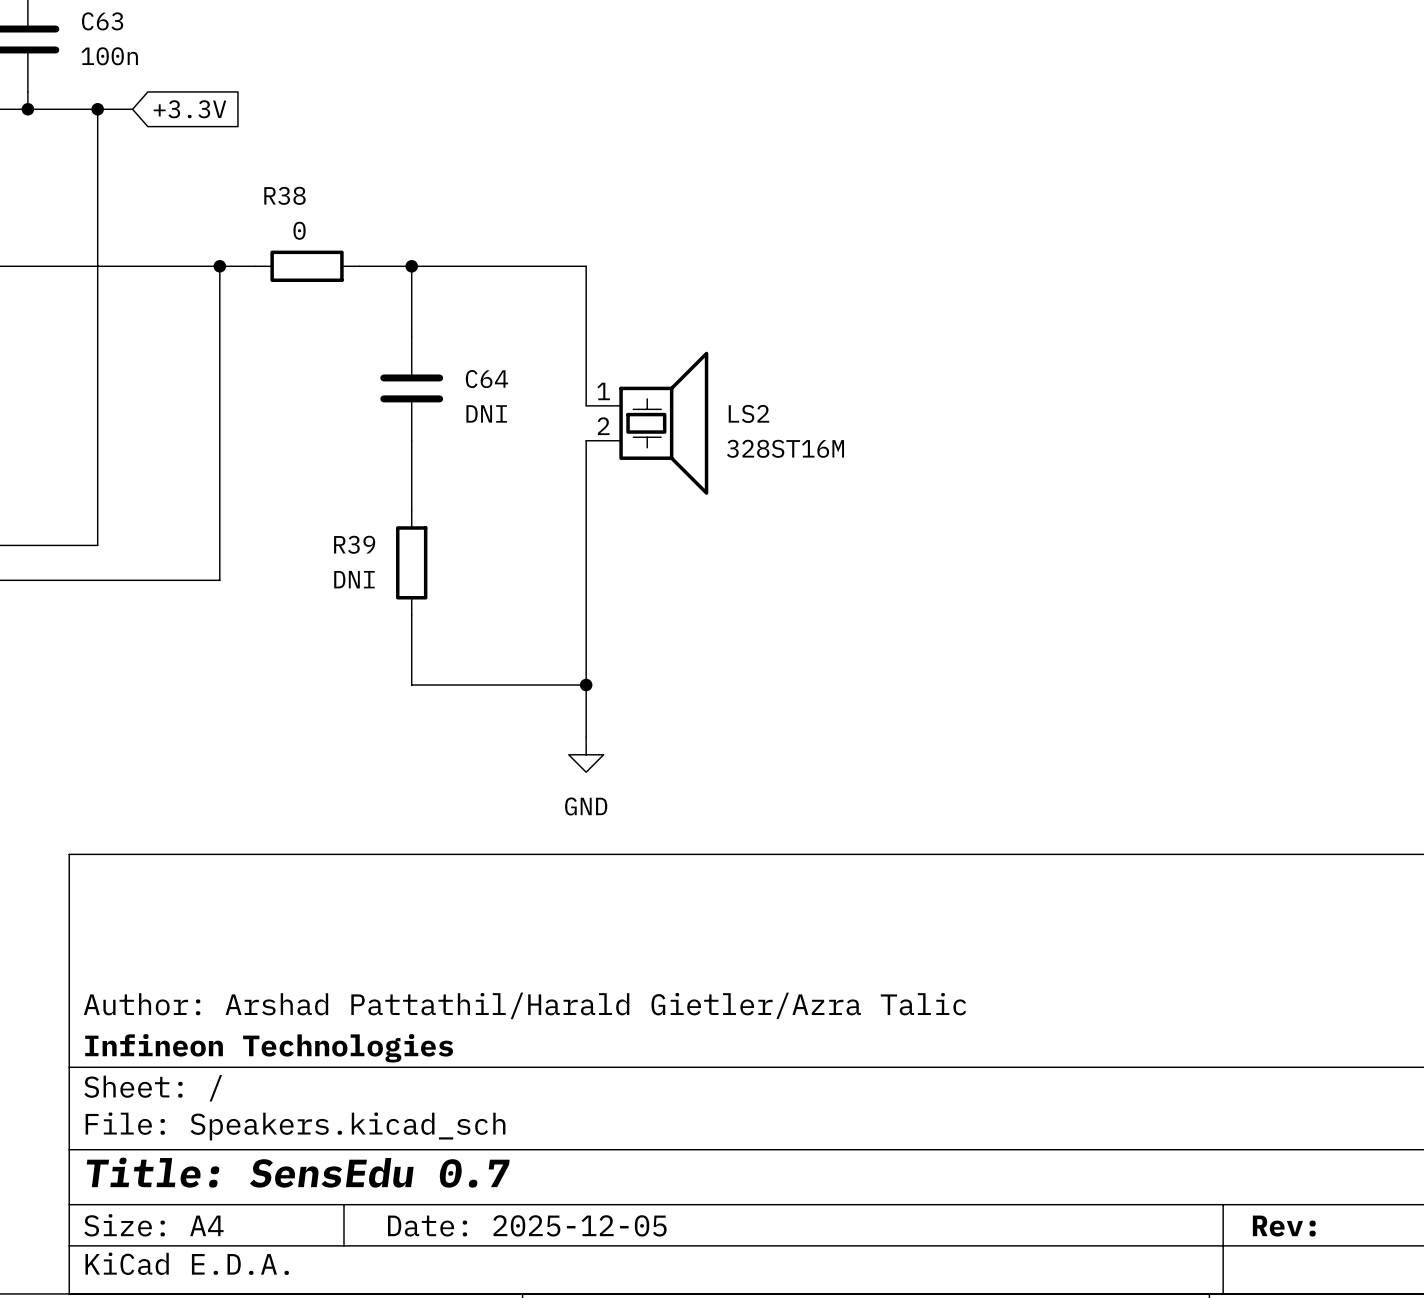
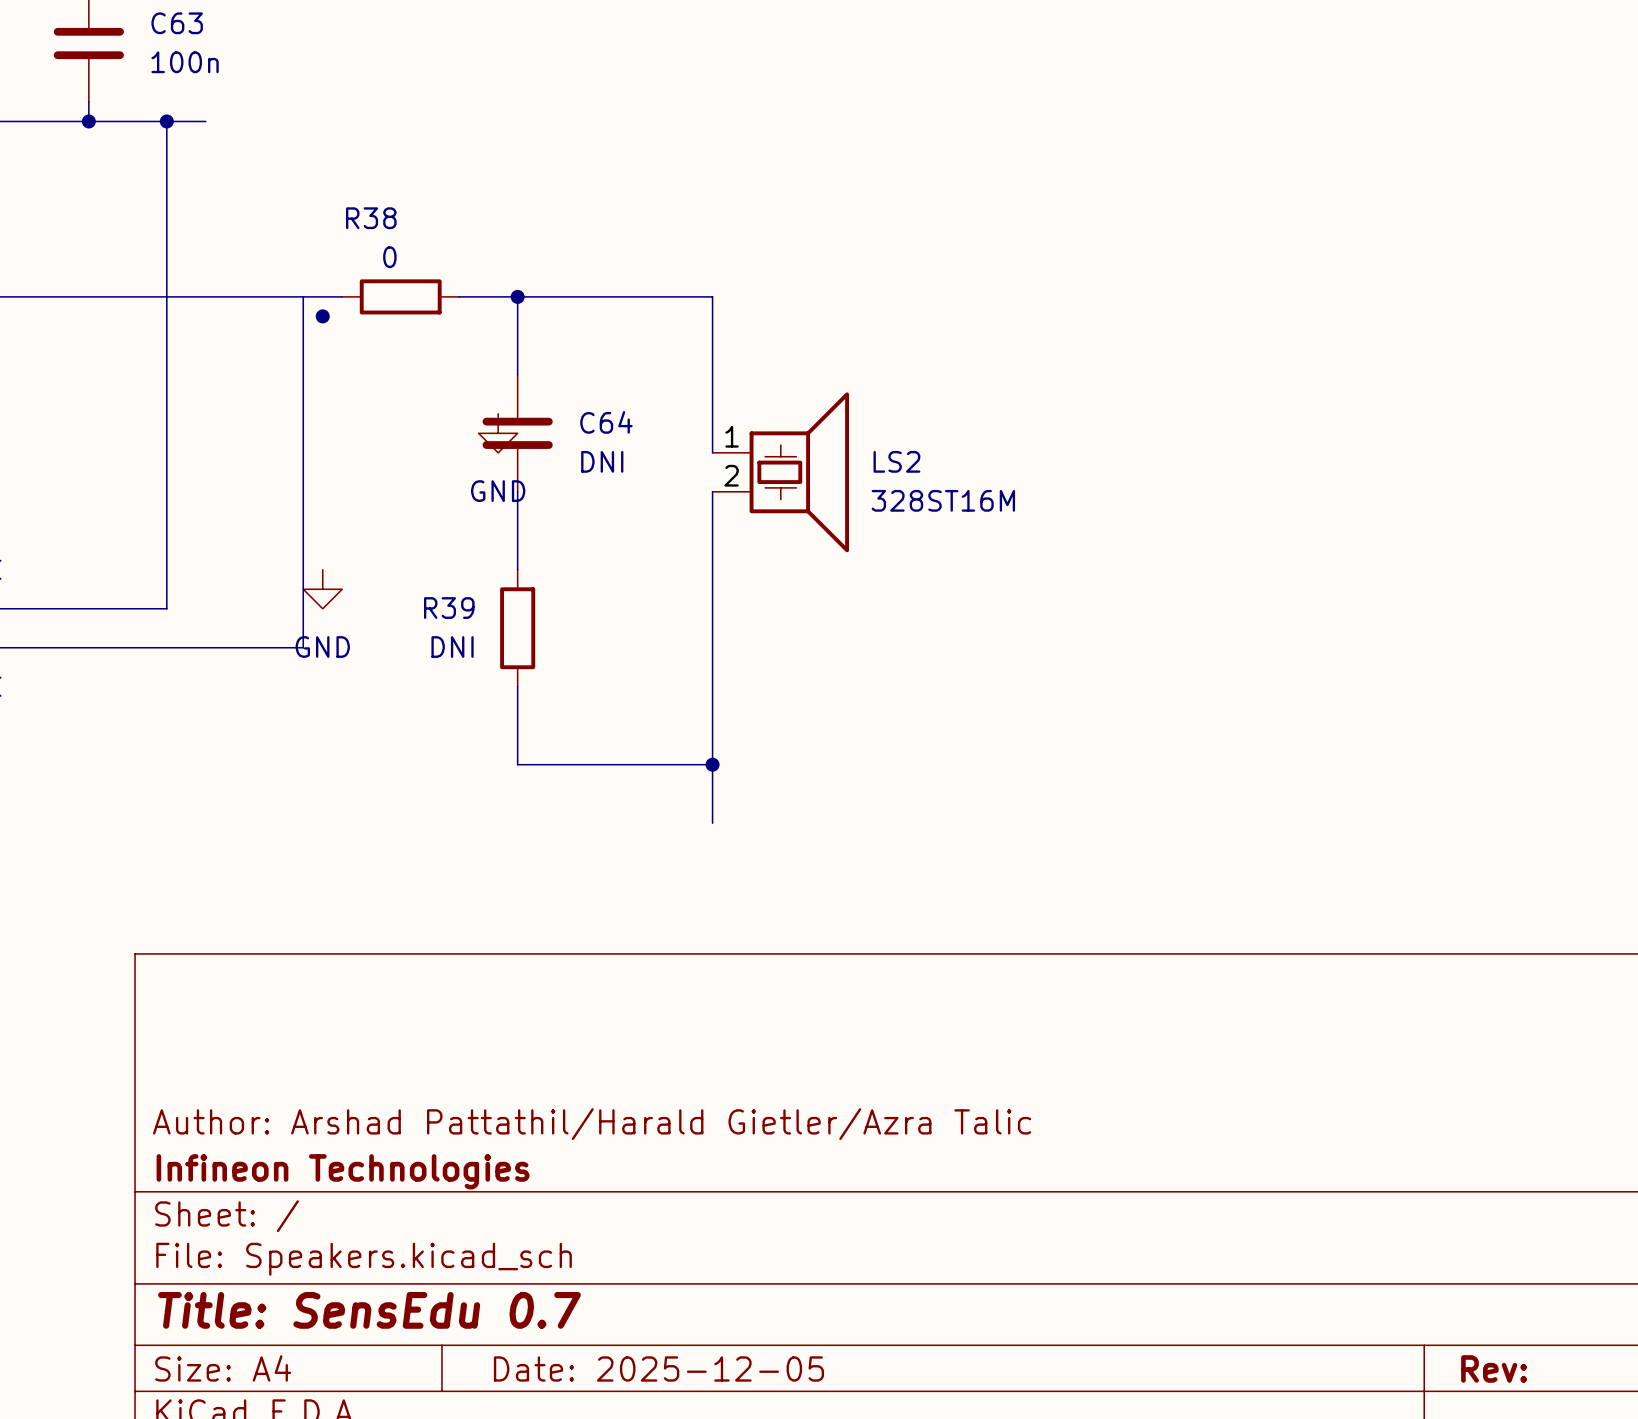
global label: +3.3V (190, 109) -> none
junction position: (219, 266) -> (322, 316)
power symbol: none -> GND (498, 433)
power symbol: none -> GND (322, 589)
power symbol: GND (586, 754) -> none

